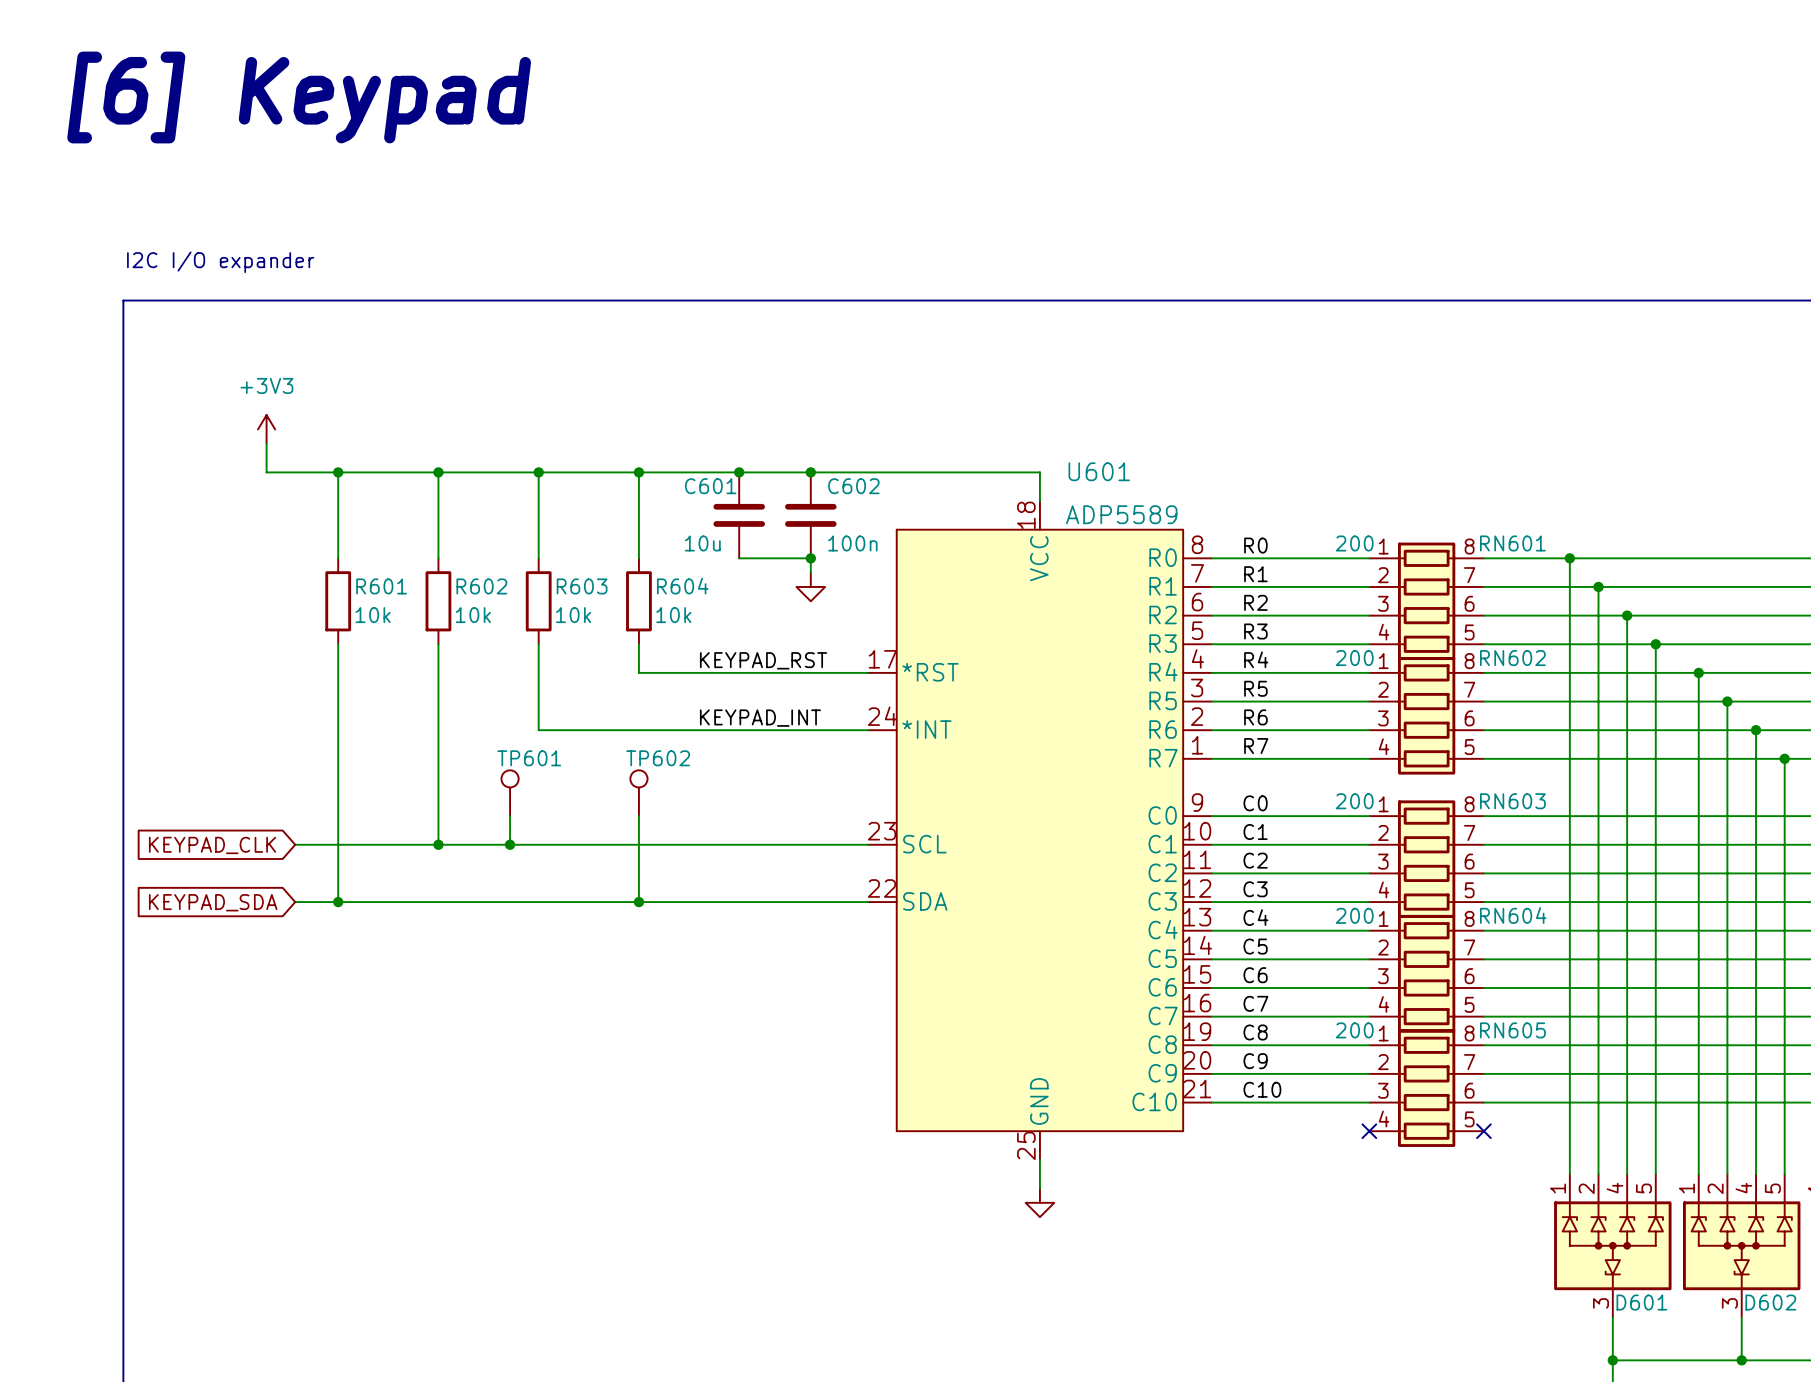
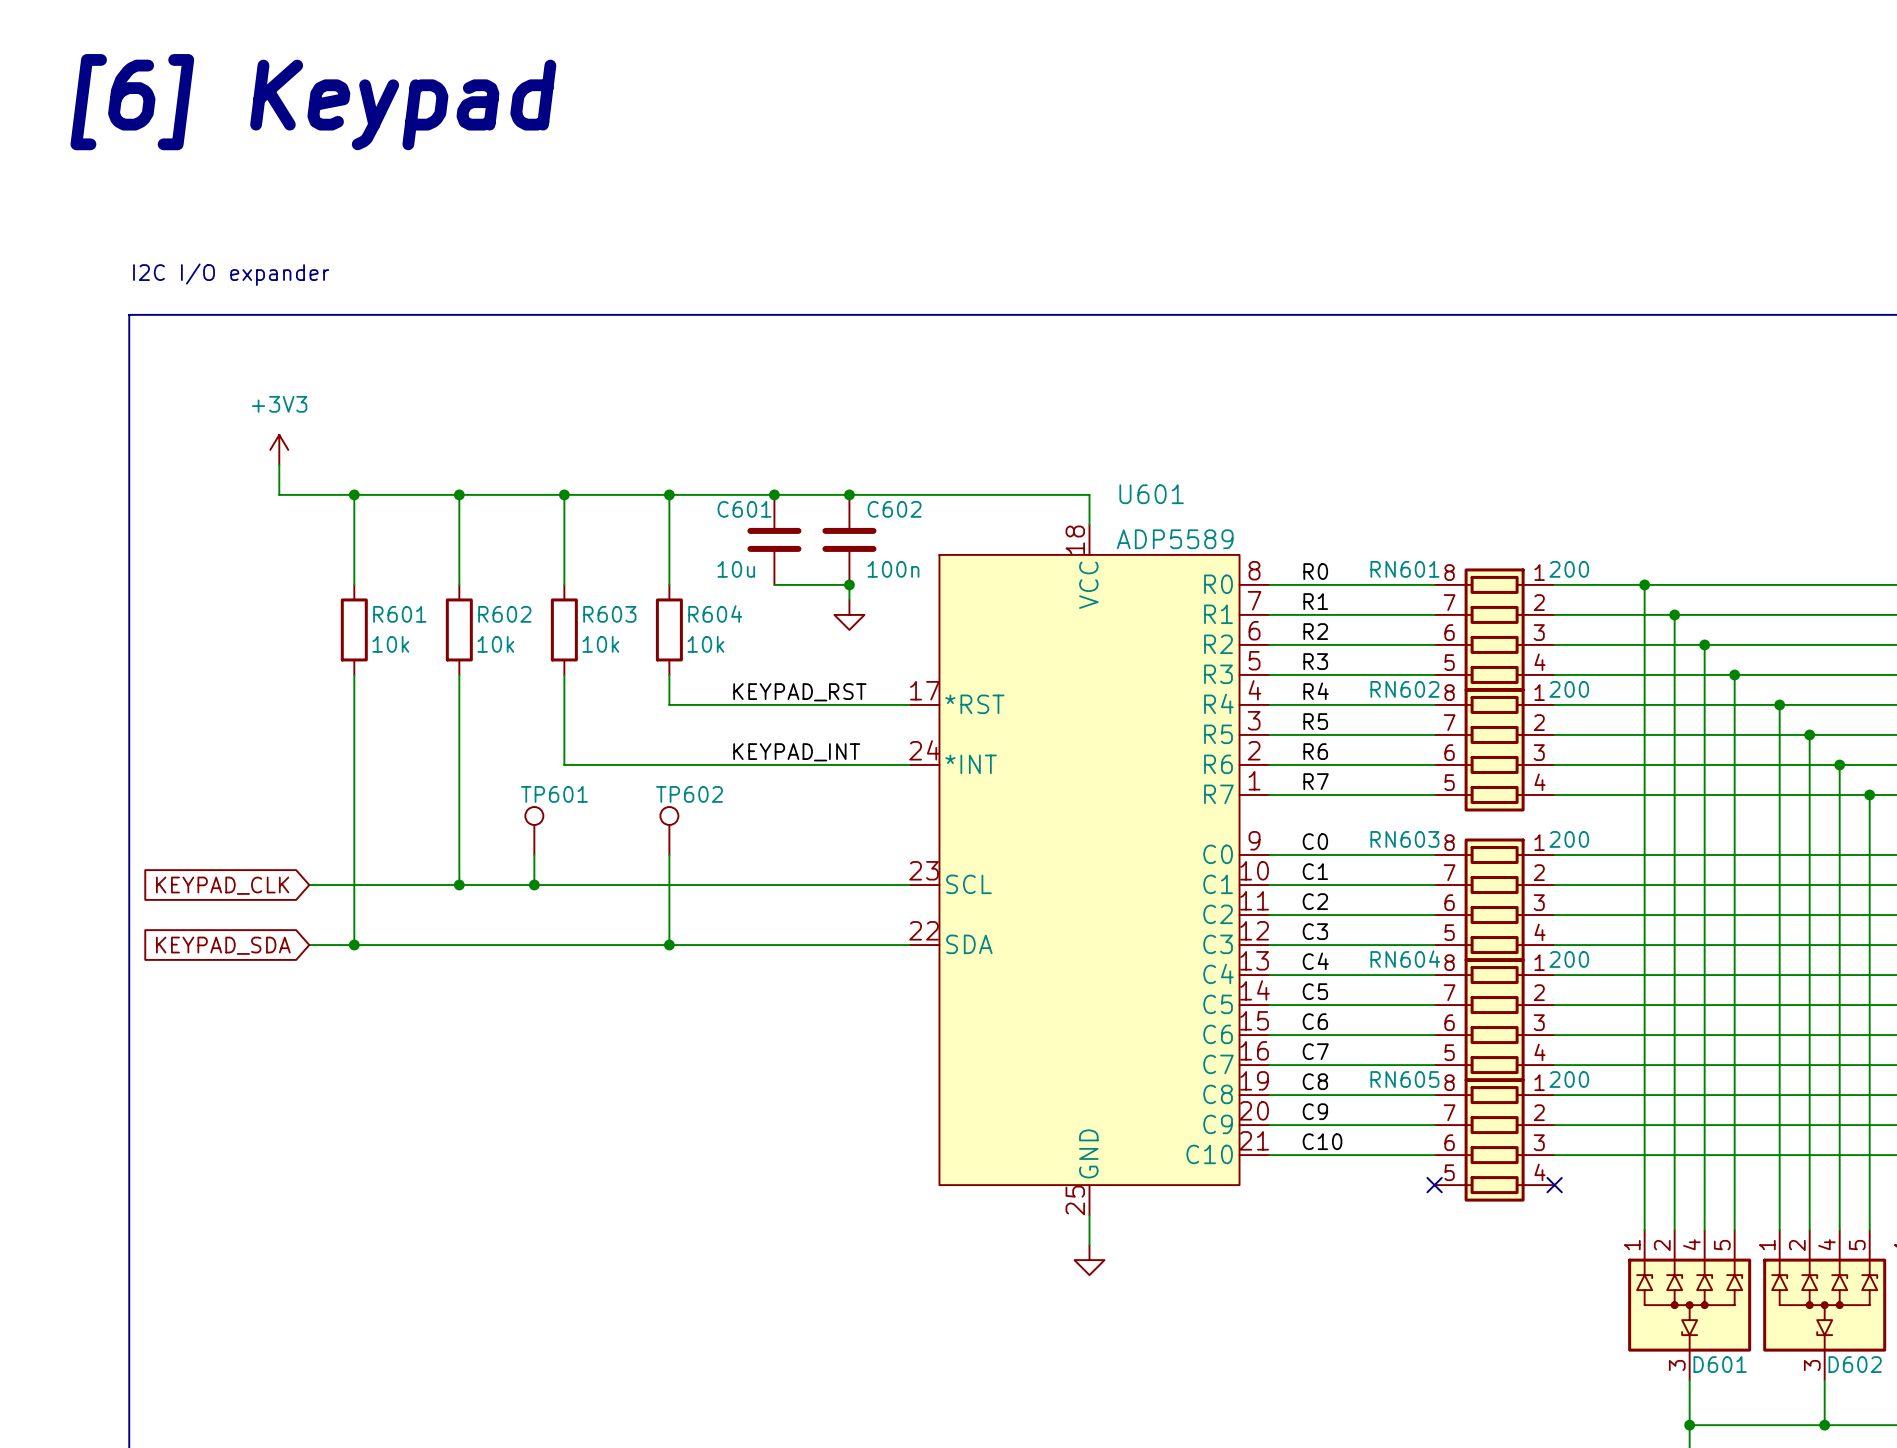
RN601 flip: as is (1426, 601) -> left-right (1494, 629)
RN602 flip: as is (1426, 715) -> left-right (1494, 749)
RN603 flip: as is (1426, 859) -> left-right (1494, 900)
RN604 flip: as is (1426, 973) -> left-right (1494, 1020)
RN605 flip: as is (1426, 1088) -> left-right (1494, 1140)

